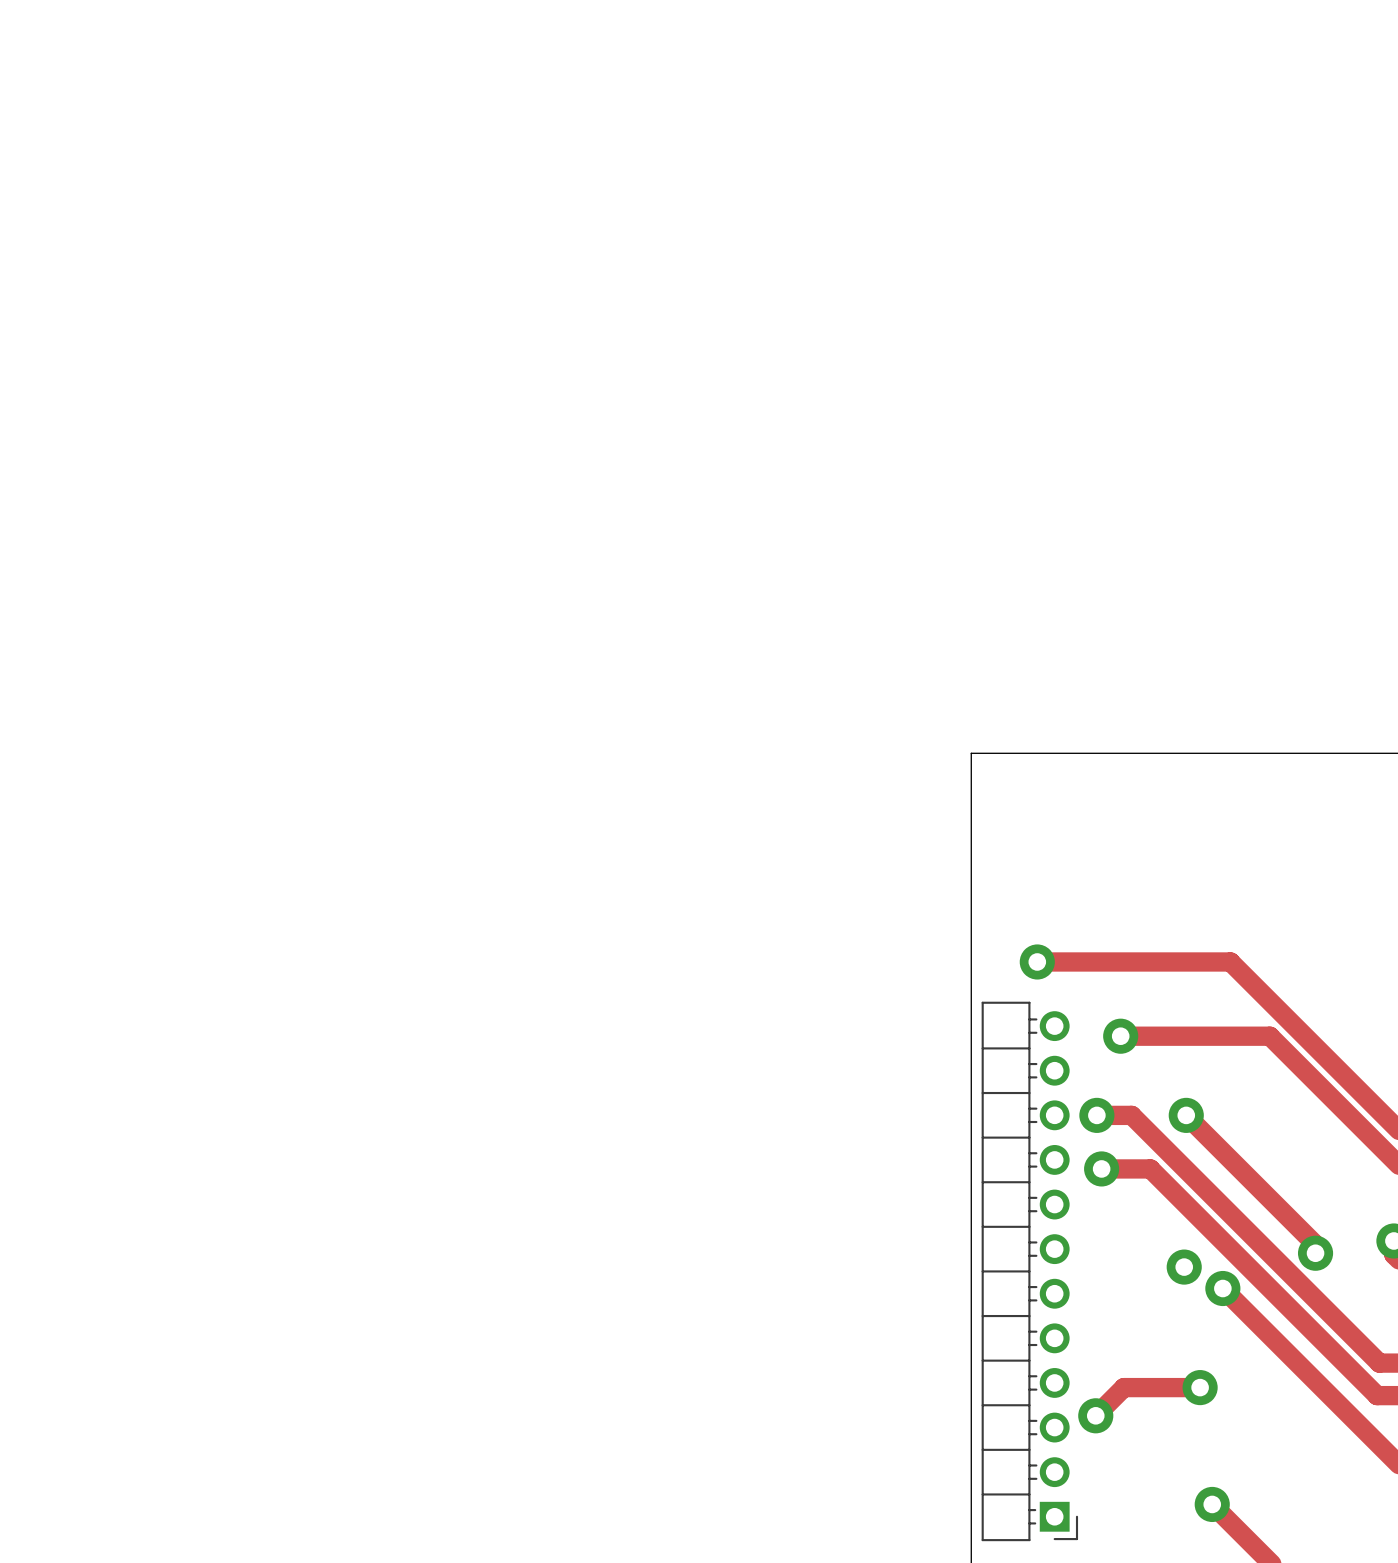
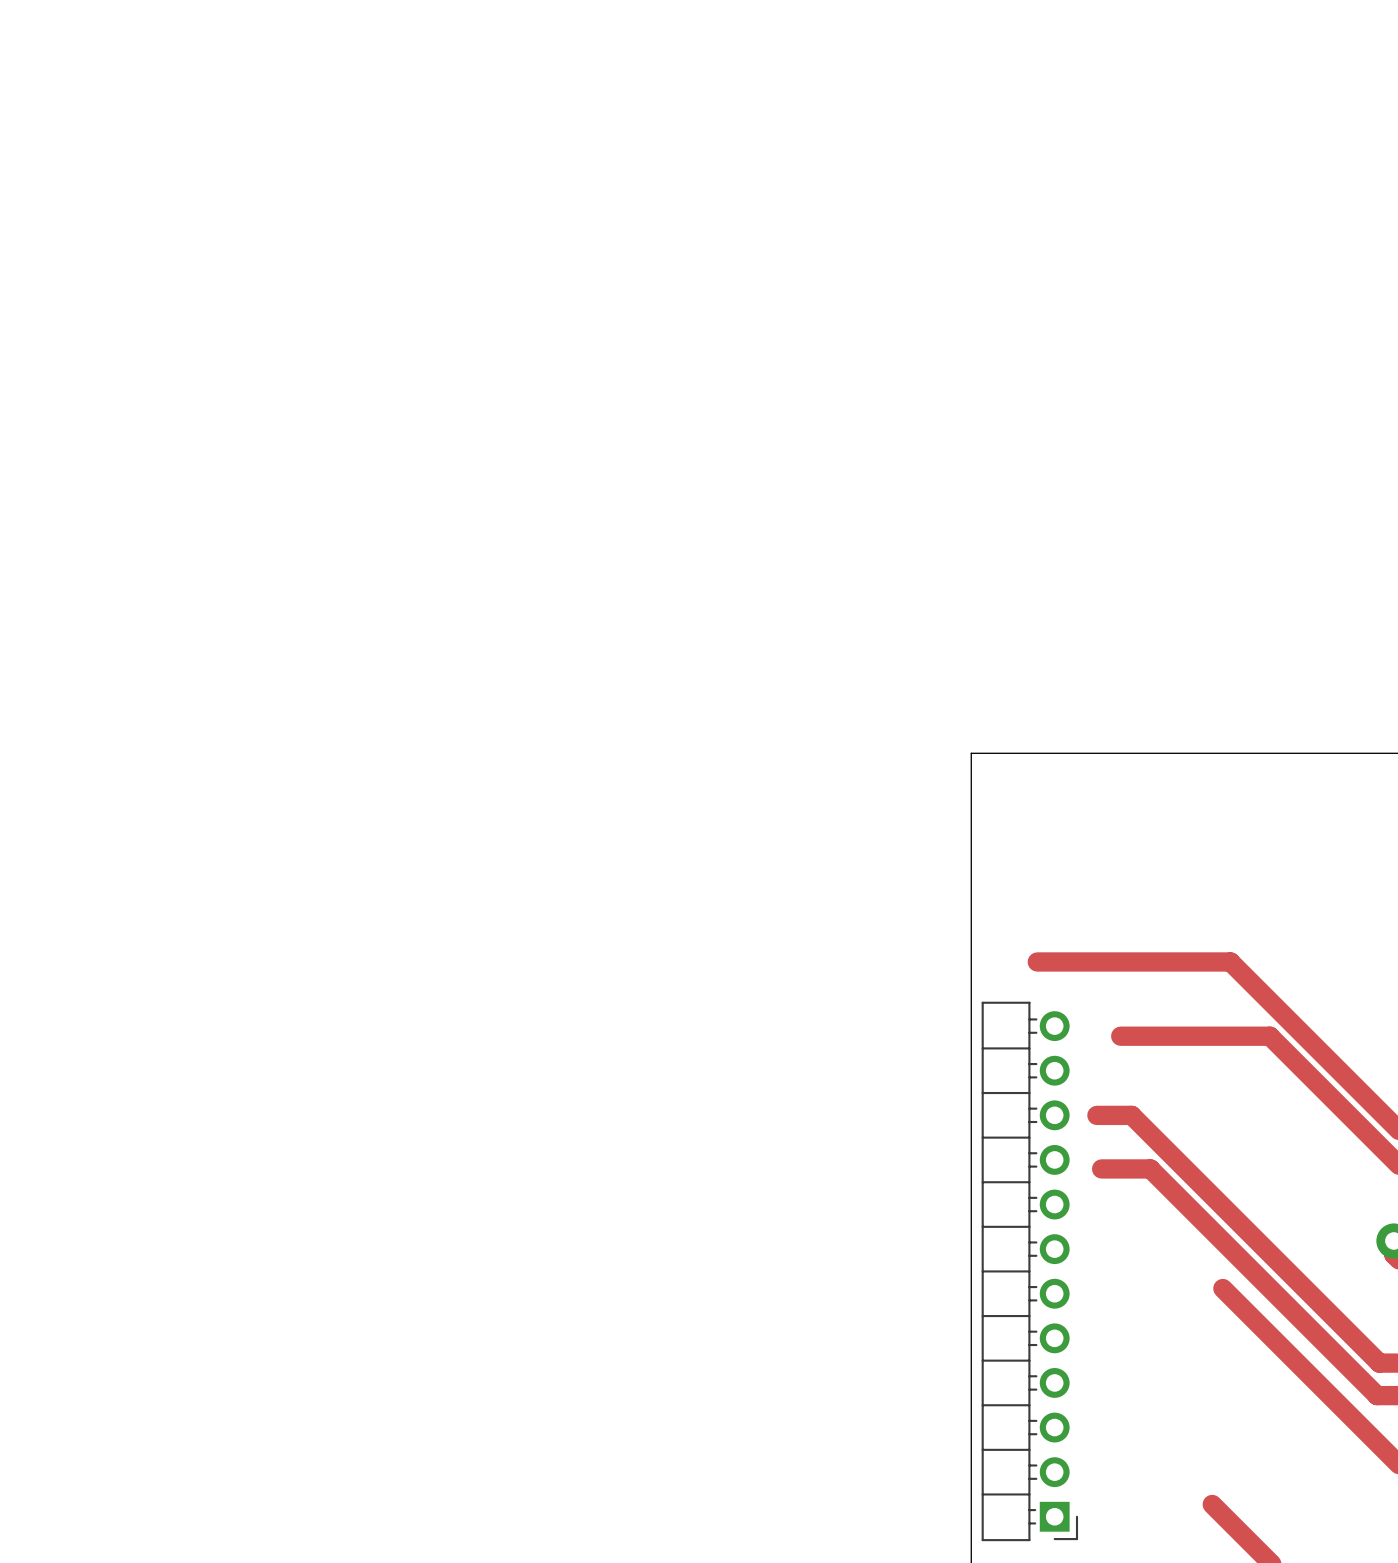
via: (1037, 961) -> none
via: (1120, 1036) -> none
via: (1096, 1115) -> none
track: (1186, 1115) (1315, 1244) (1315, 1253) -> none
via: (1186, 1115) -> none
via: (1101, 1168) -> none
via: (1315, 1253) -> none
via: (1184, 1267) -> none
via: (1222, 1288) -> none
track: (1200, 1387) (1123, 1387) (1095, 1415) -> none
via: (1200, 1387) -> none
via: (1095, 1415) -> none
via: (1212, 1504) -> none

